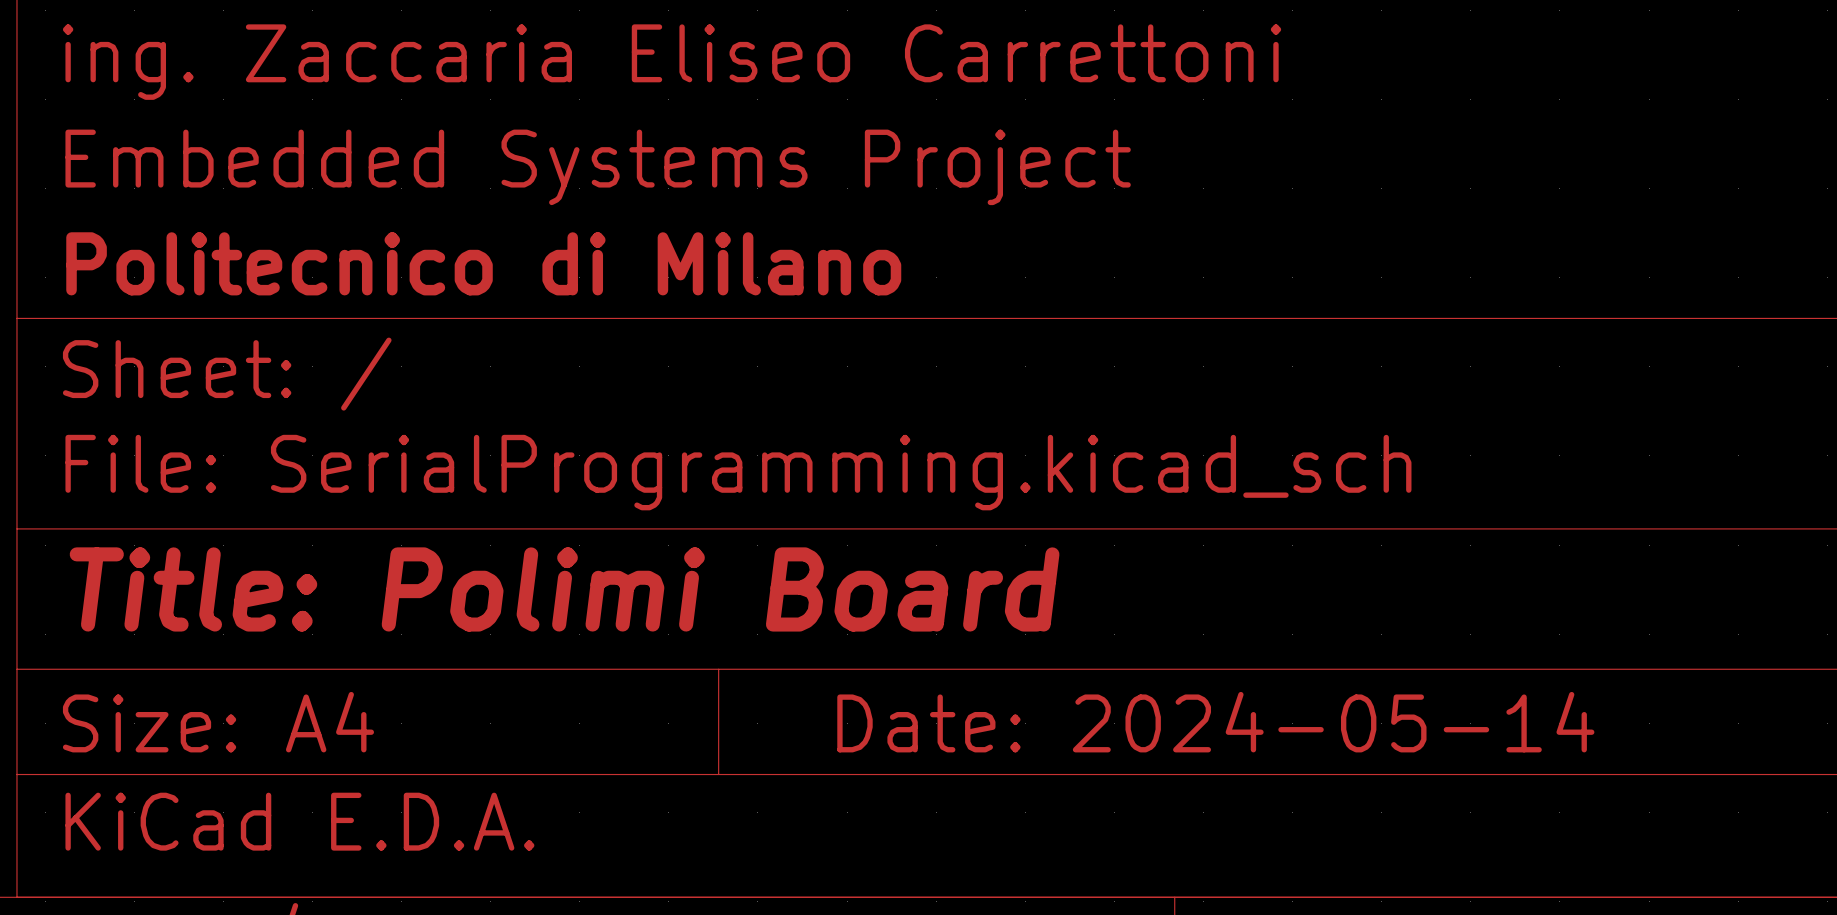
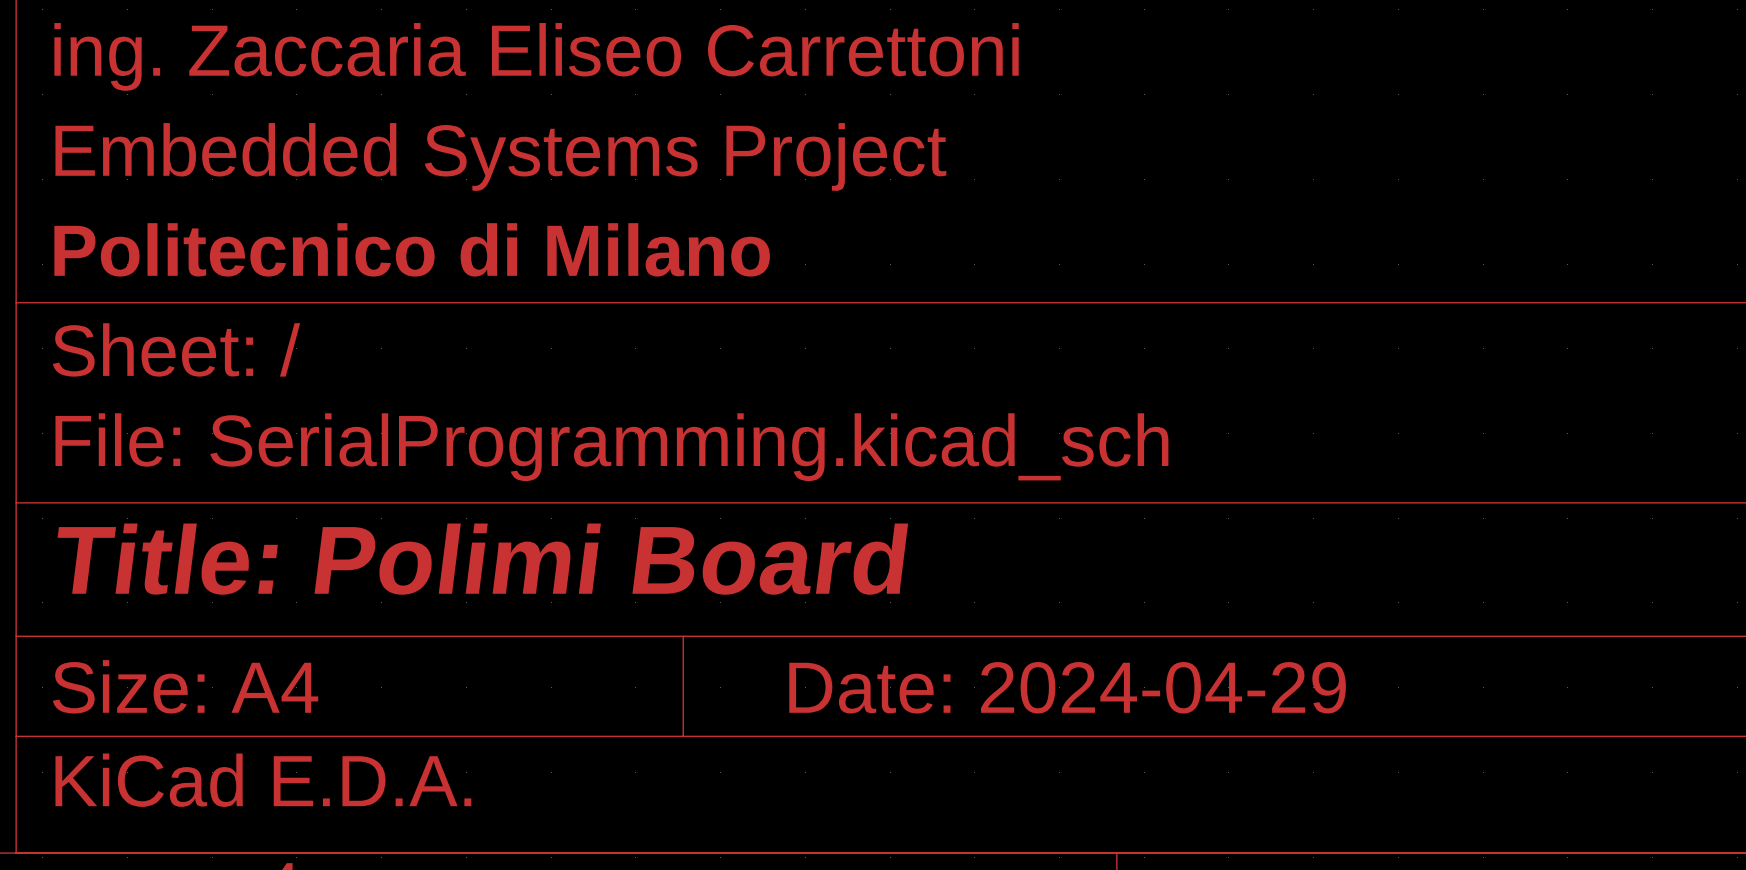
title block: Date: 2024-05-14 (1215, 722) -> Date: 2024-04-29 (1067, 687)

